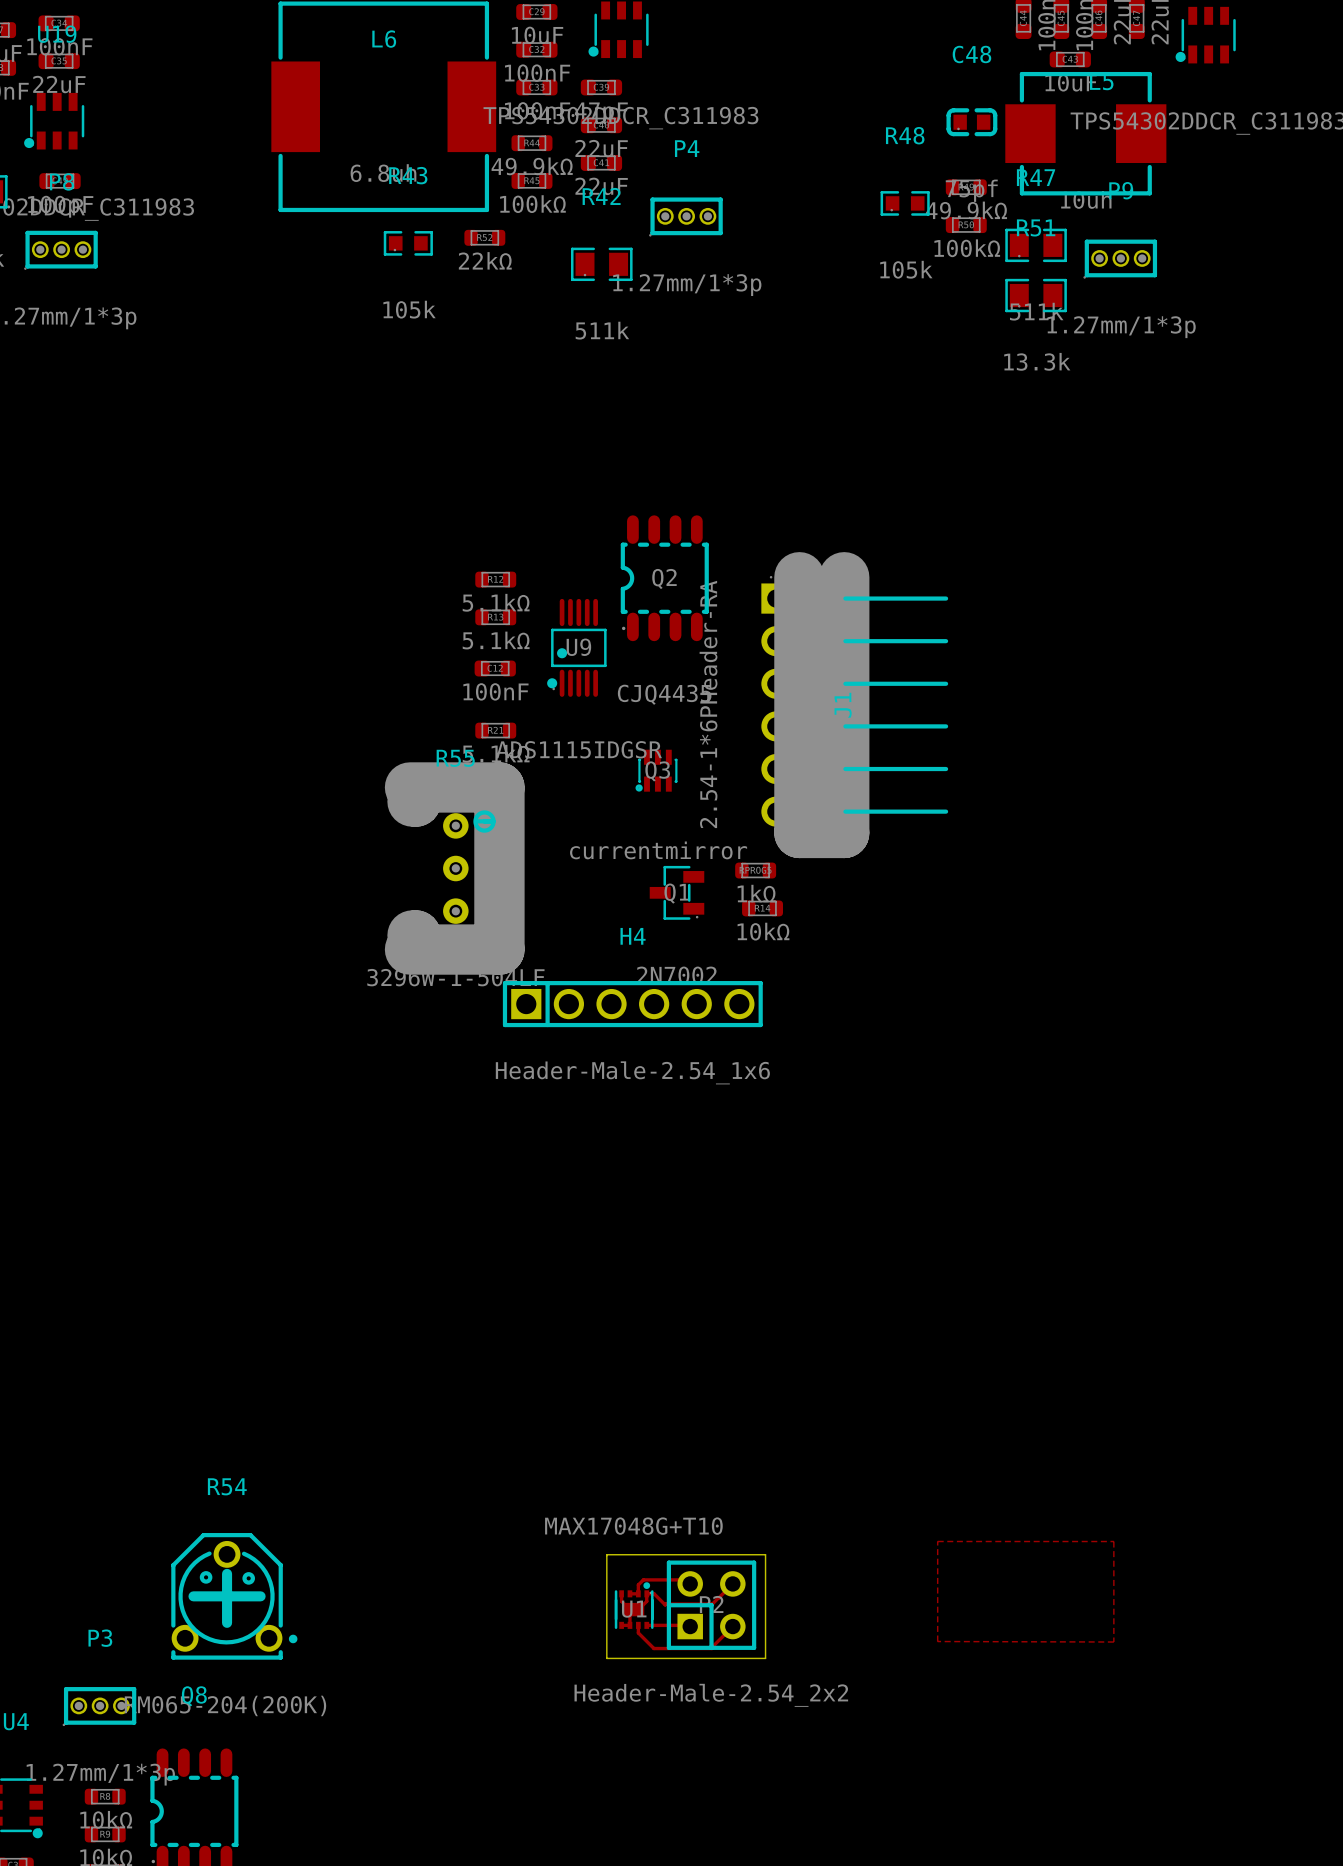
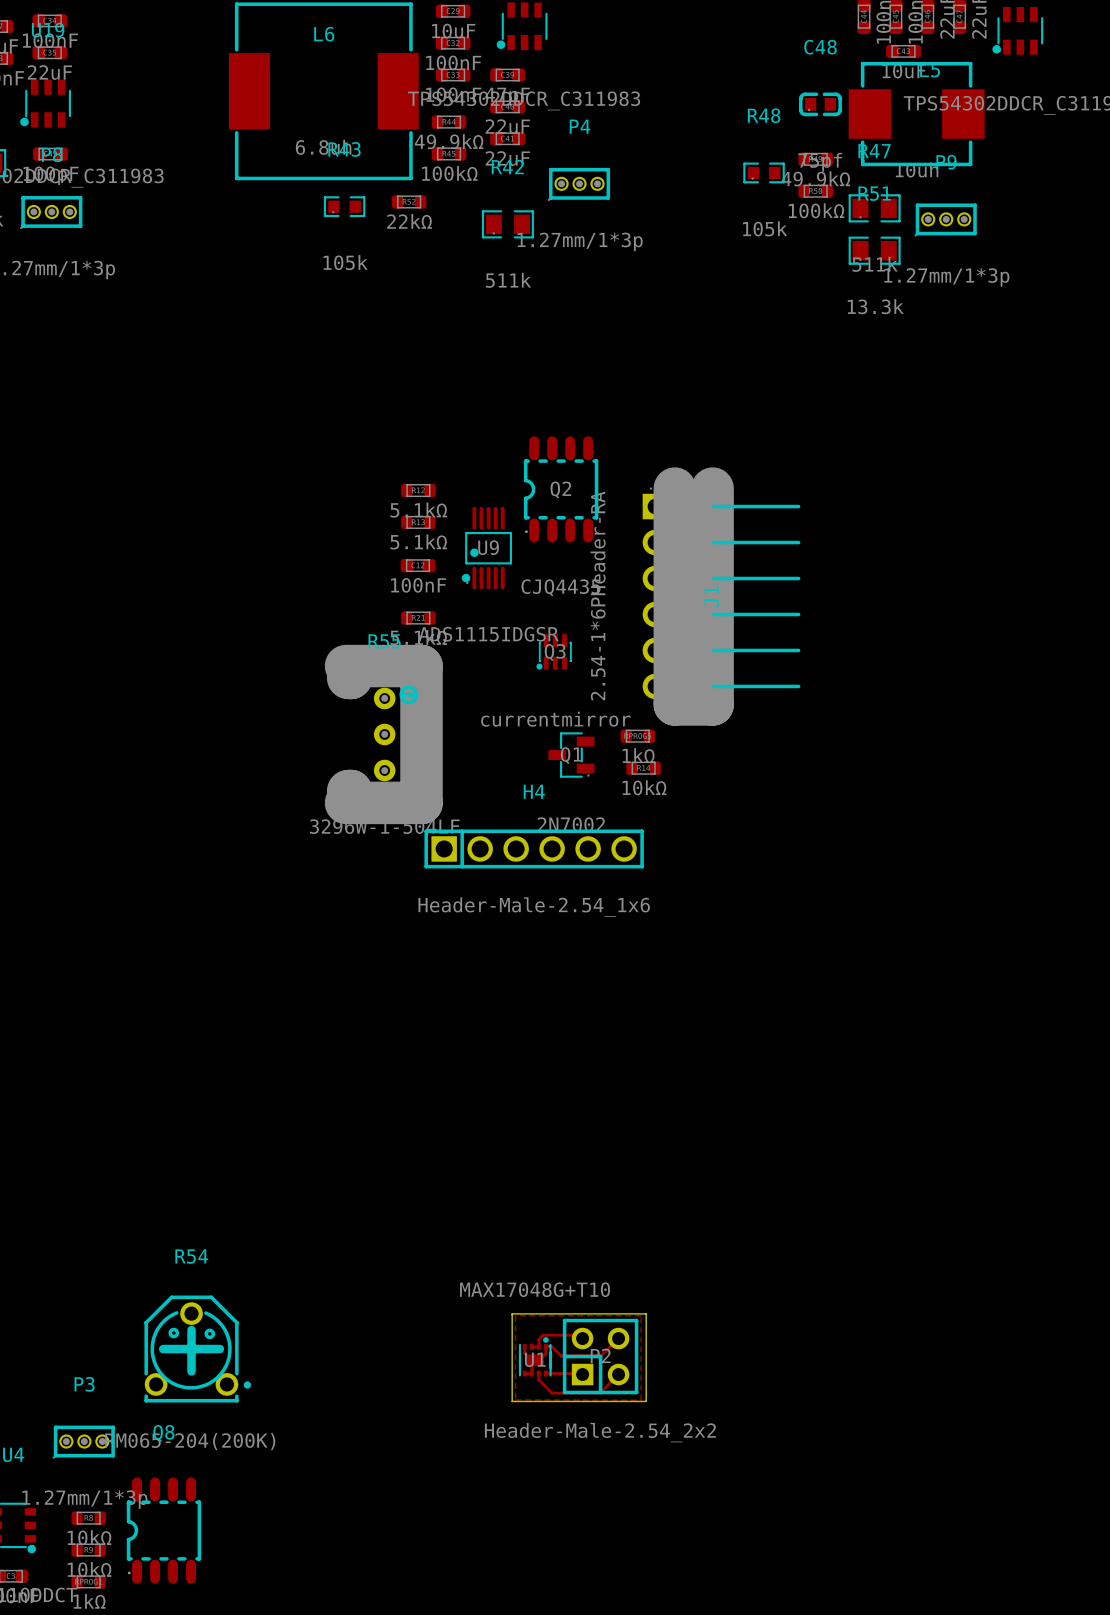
top zone outline: (937, 1541) (937, 1641) (1113, 1642) (1113, 1541) (937, 1541) -> none
top zone outline: none -> (515, 1315) (515, 1399) (641, 1400) (641, 1315) (515, 1315)

